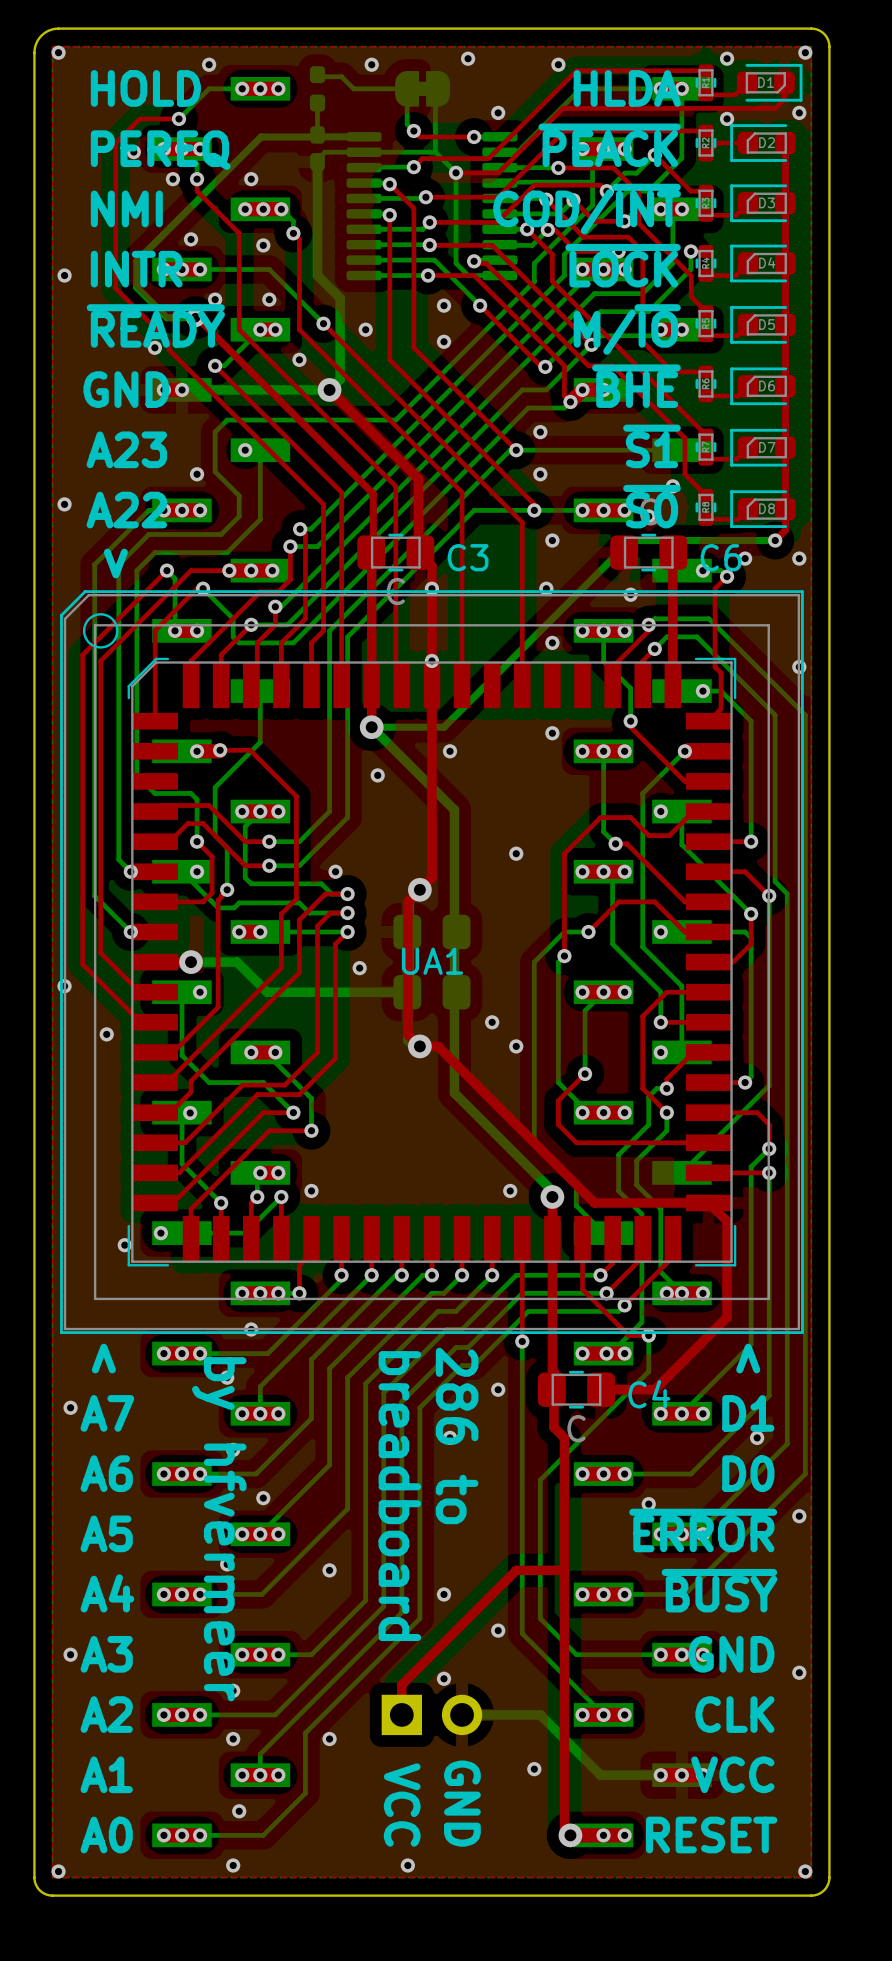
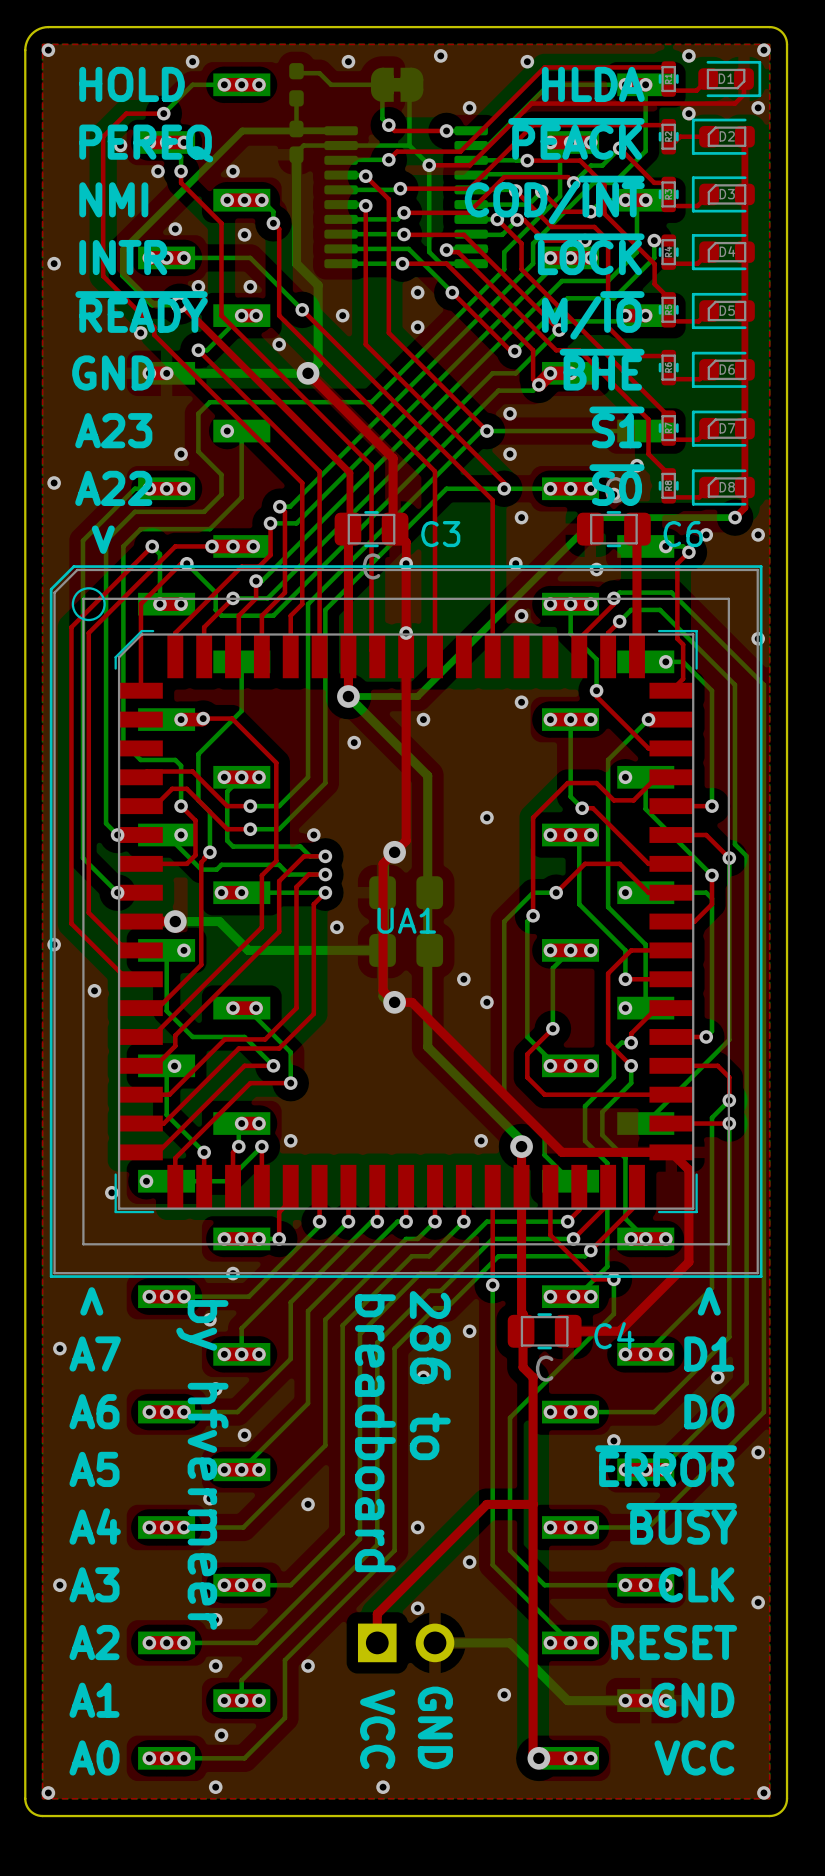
text: GND (731, 1654) -> CLK (696, 1584)
text: CLK (734, 1714) -> RESET (674, 1642)
text: VCC (732, 1774) -> GND (693, 1700)
text: RESET (711, 1835) -> VCC (694, 1757)

